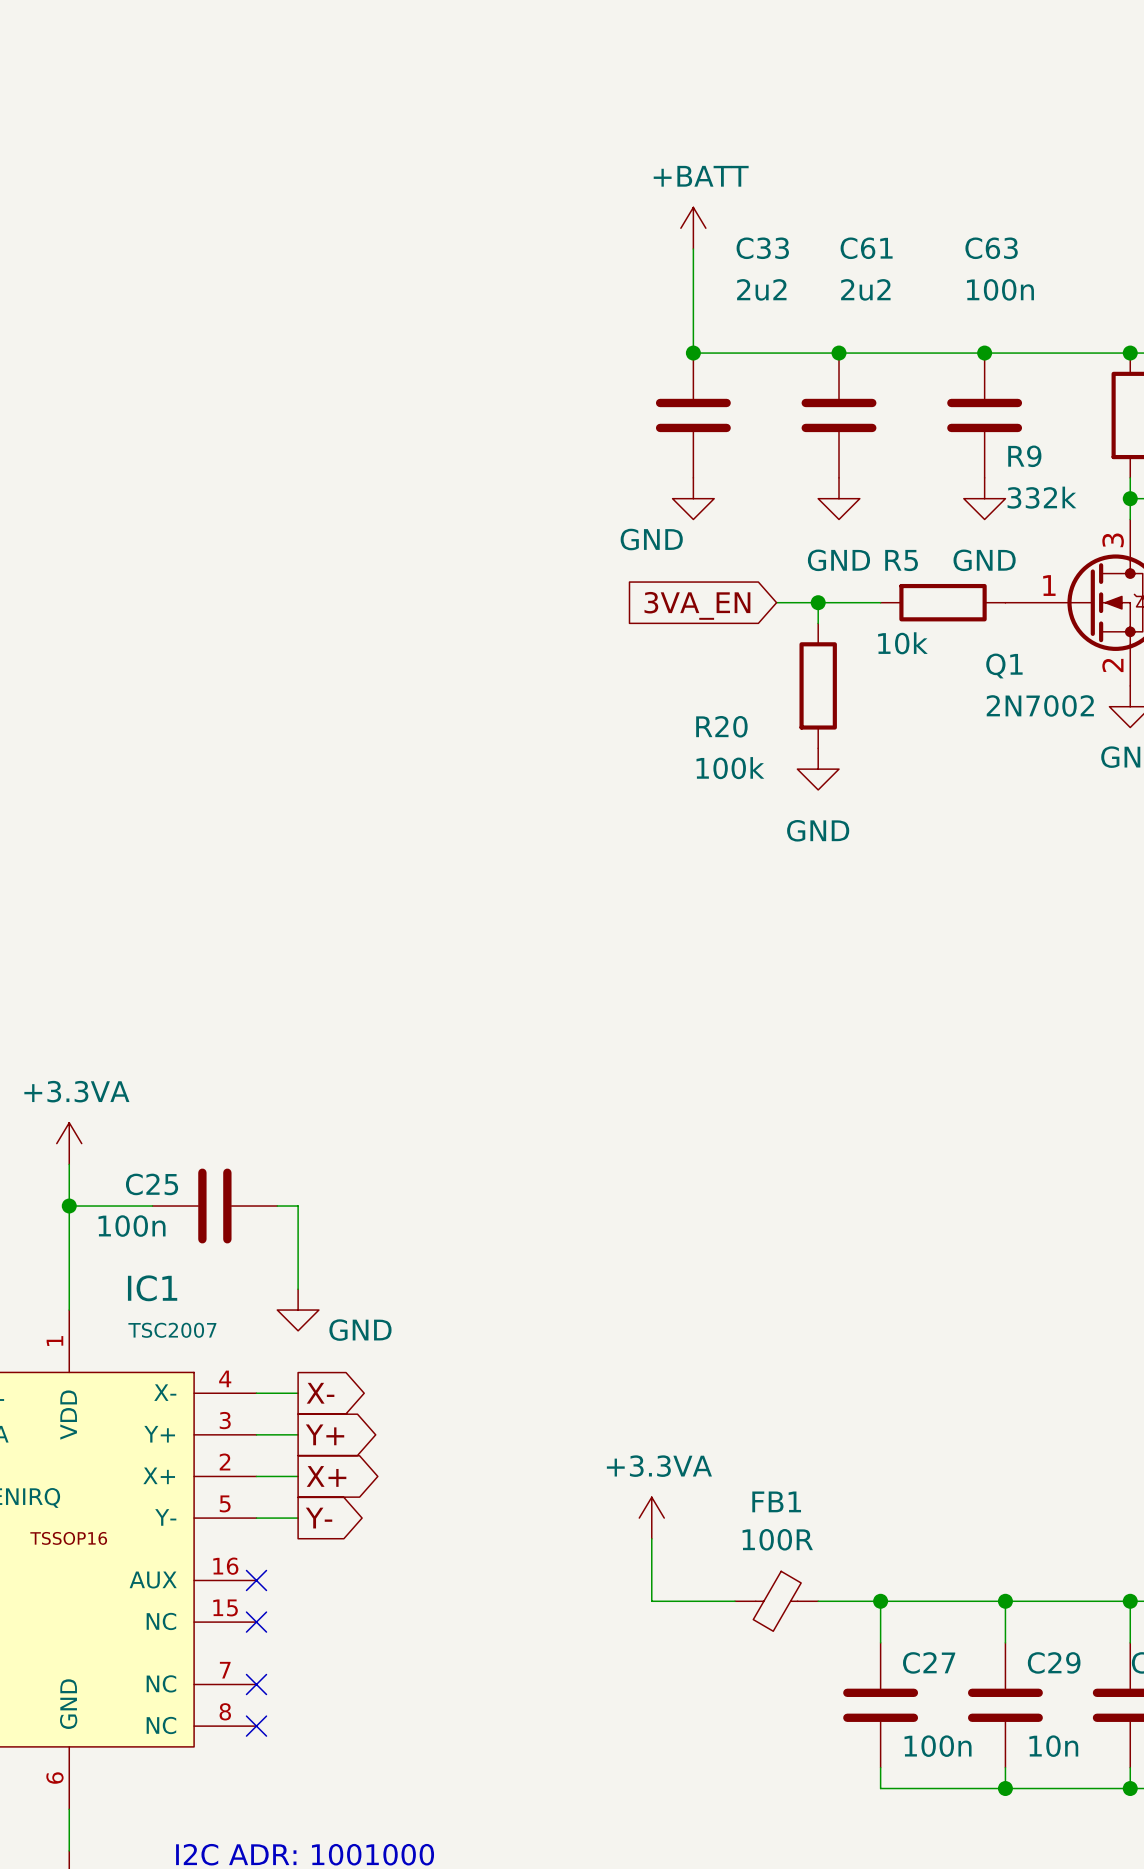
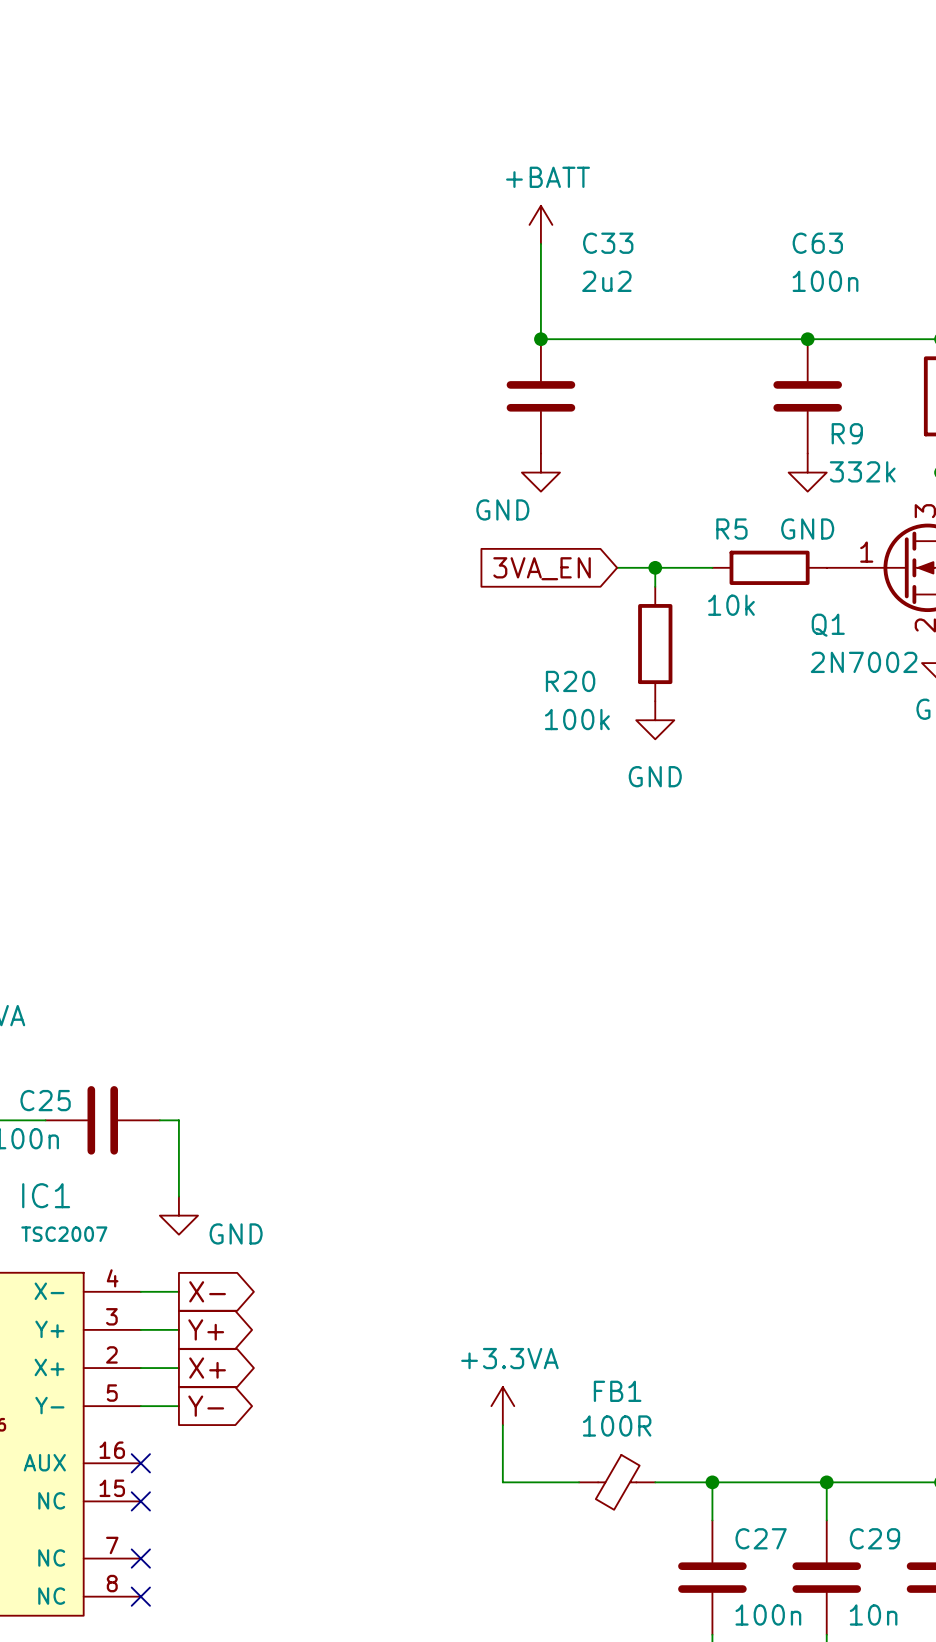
junction: (839, 353) -> none
C61: 2u2 (839, 415) -> none
power symbol: GND (839, 498) -> none

